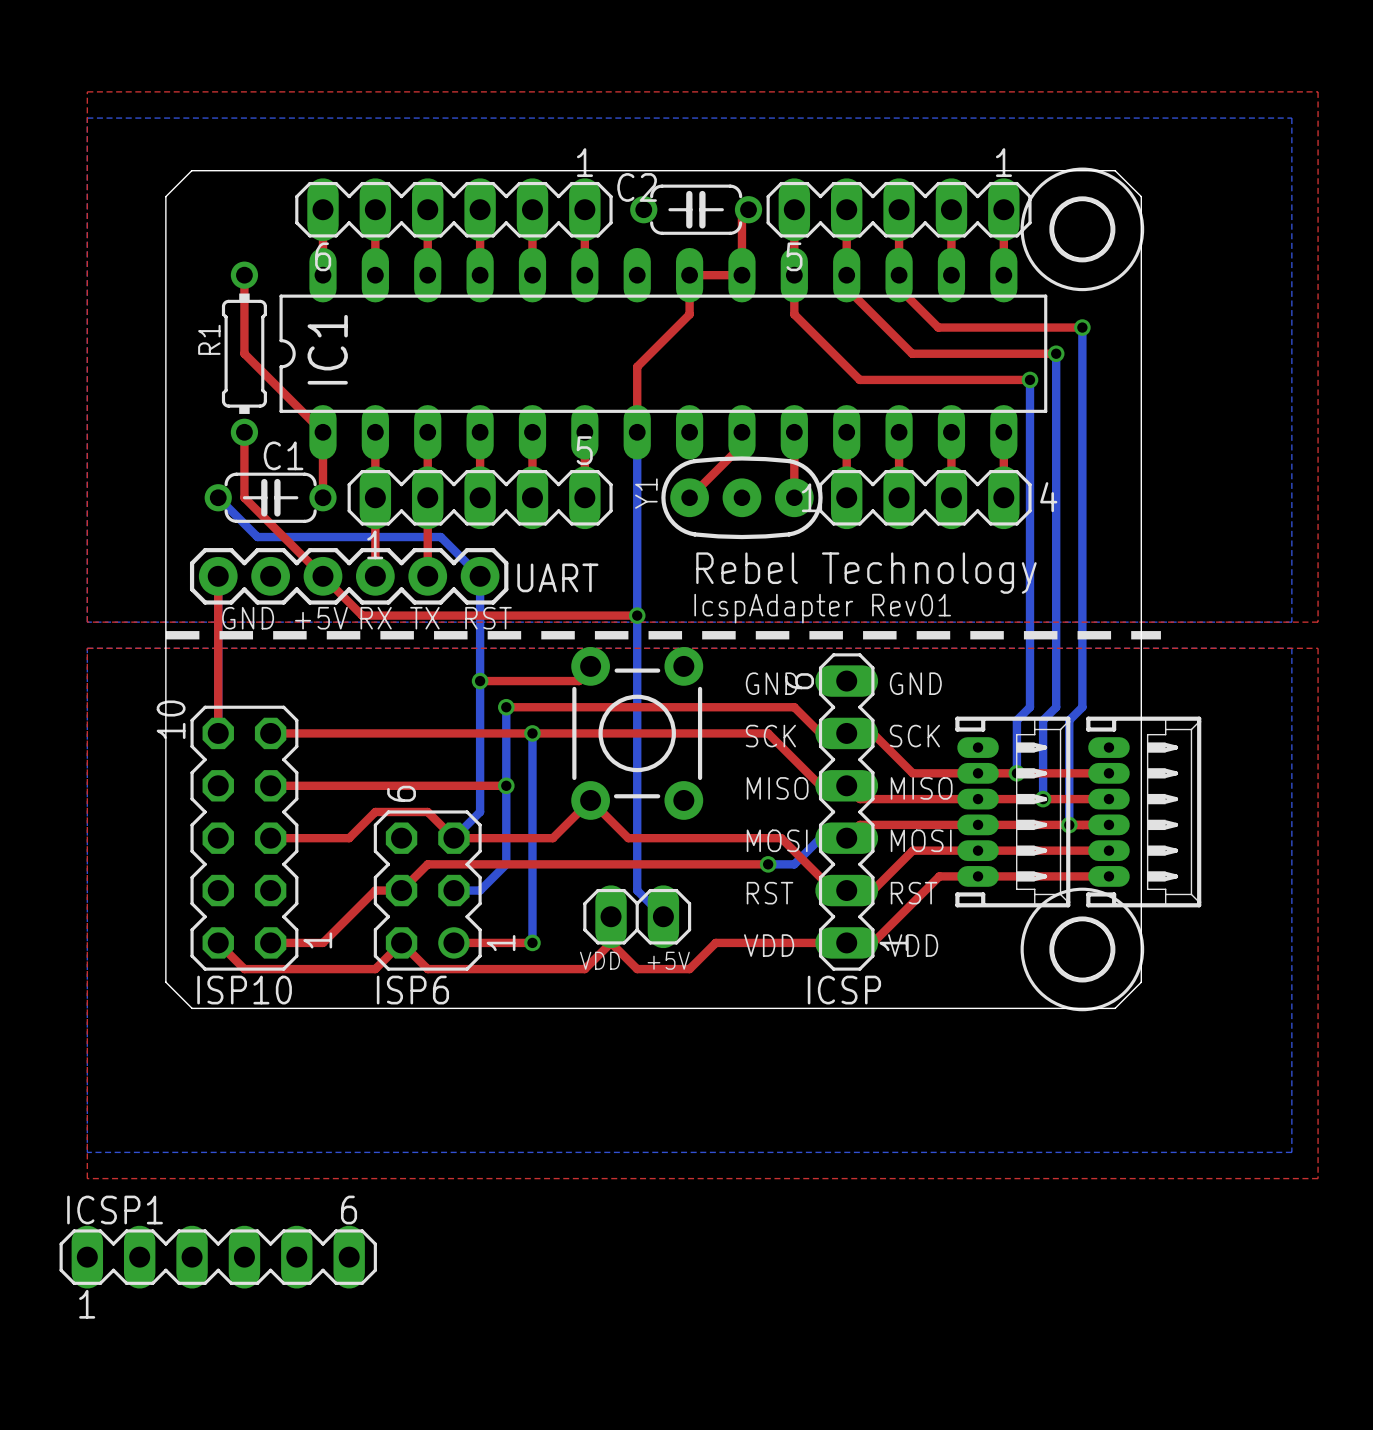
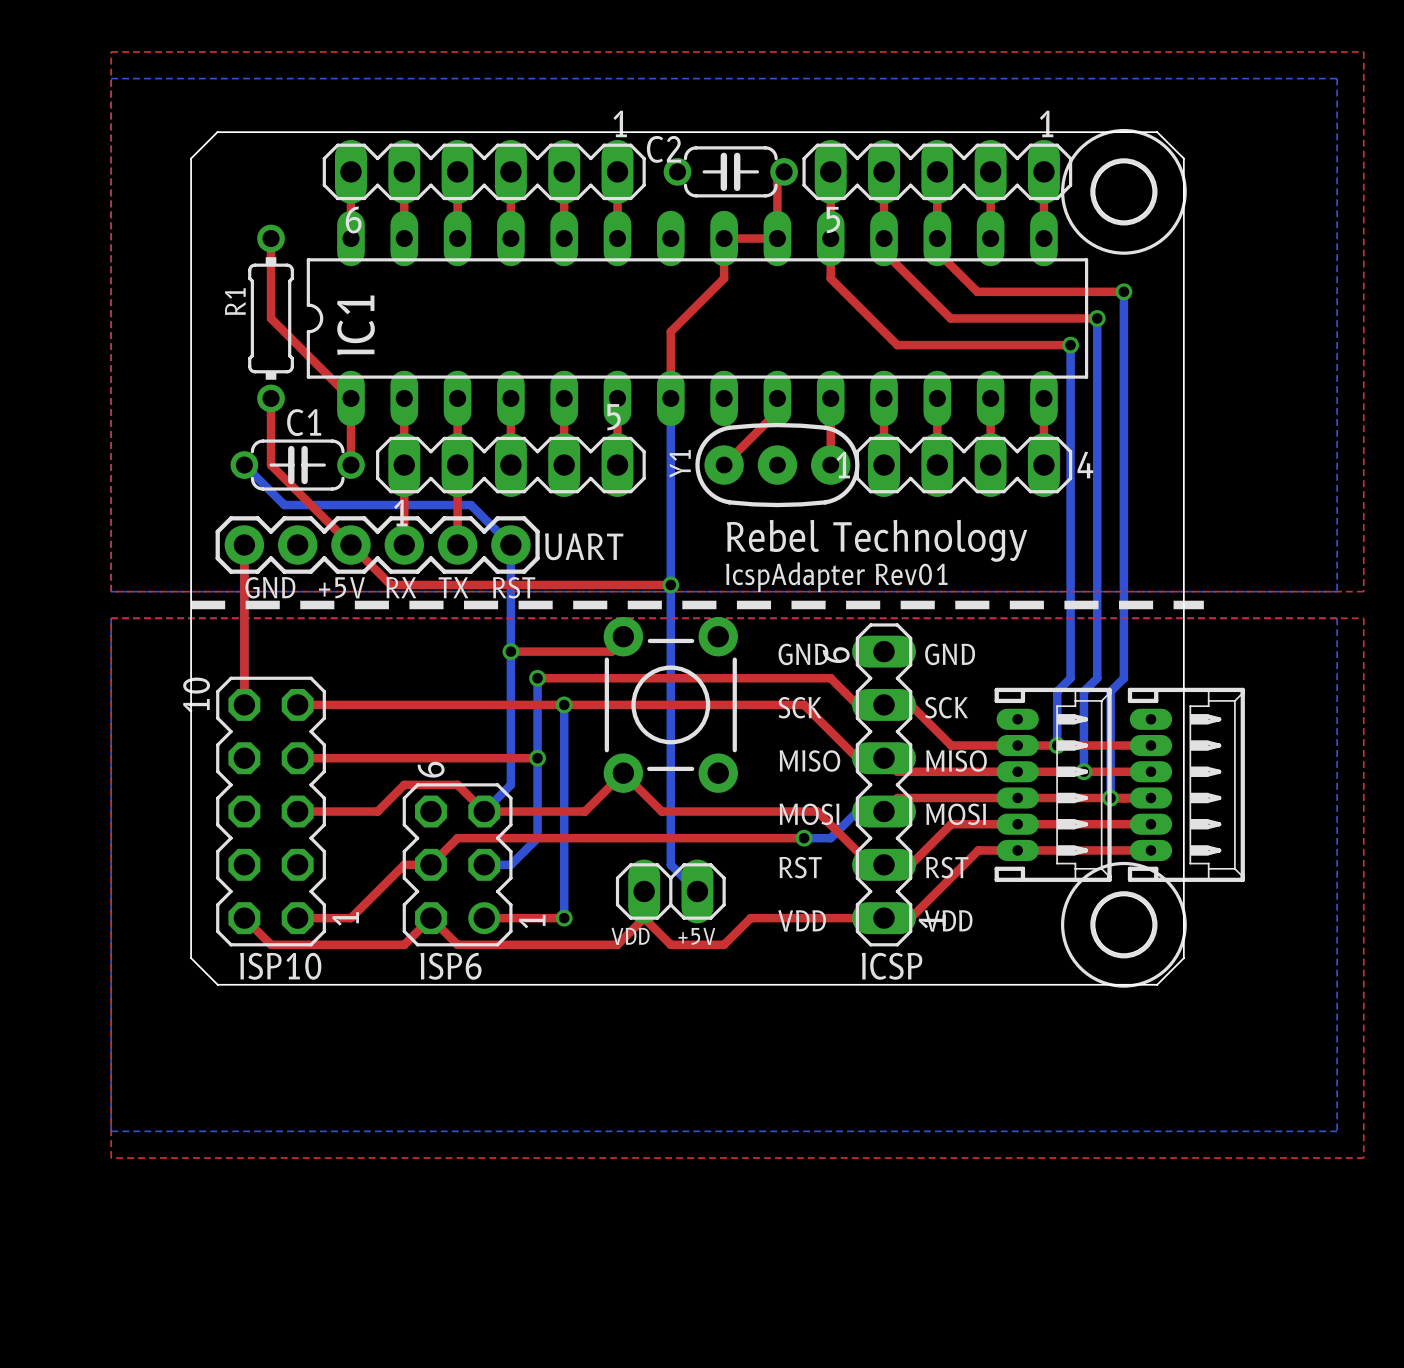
ICSP1: (218, 1257) -> none

